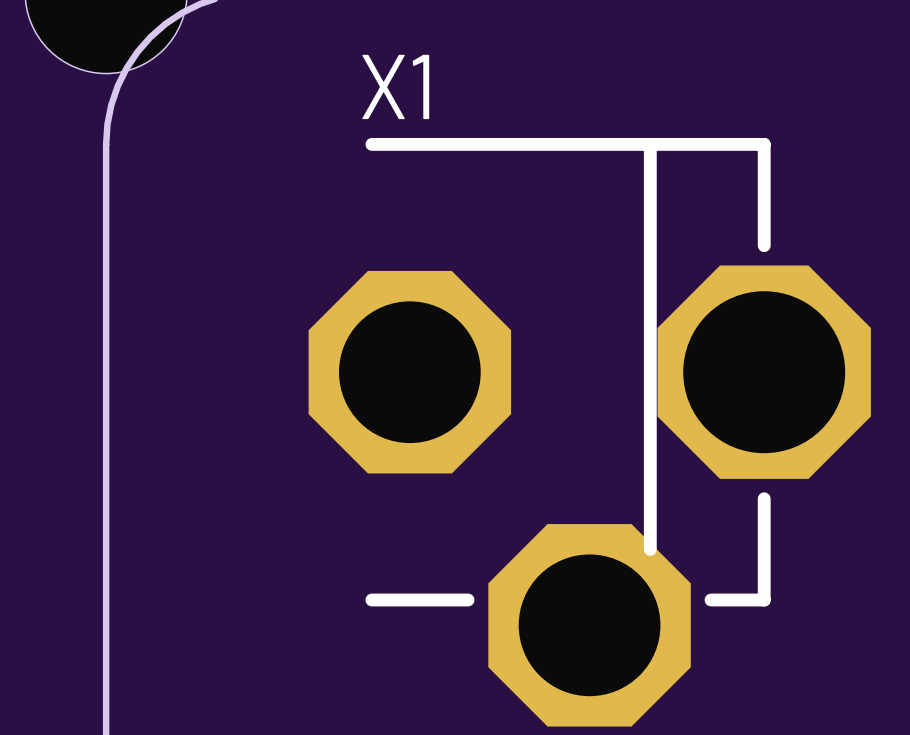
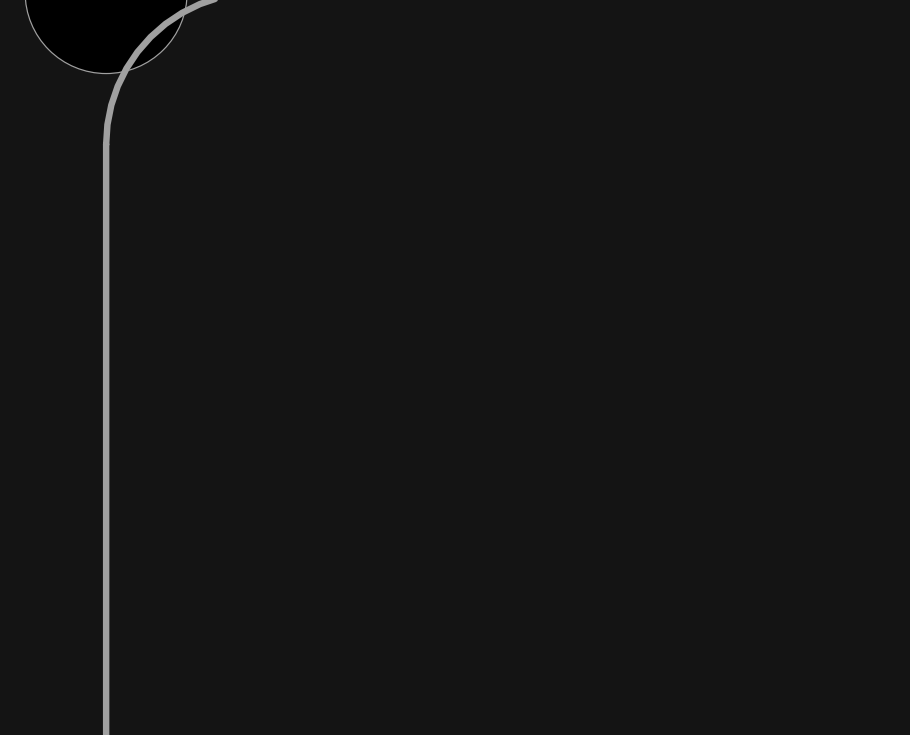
X1: (589, 432) -> none

